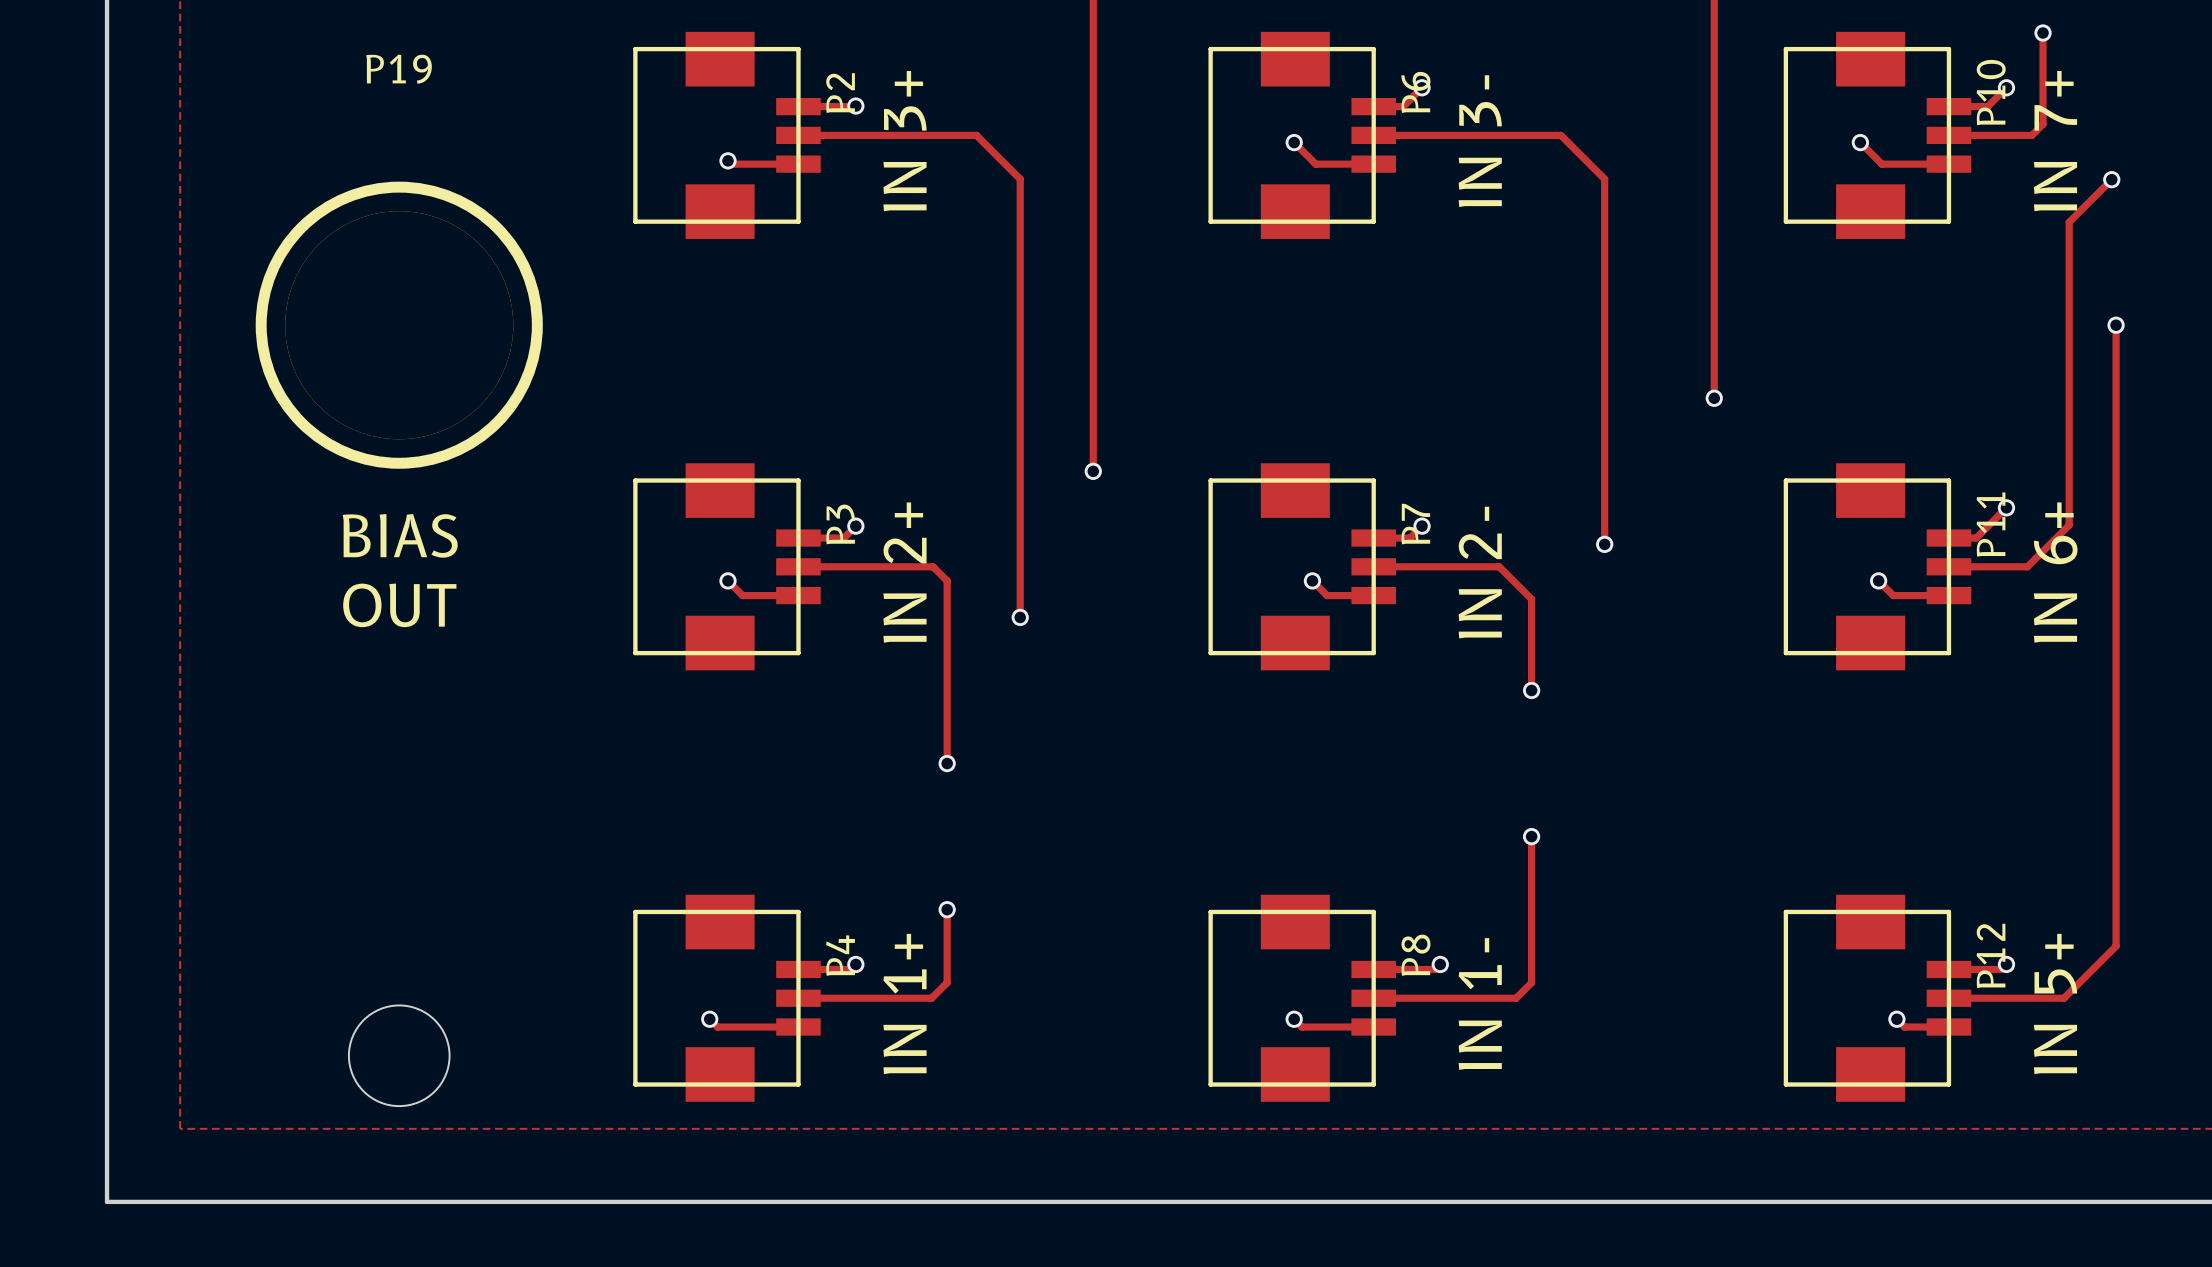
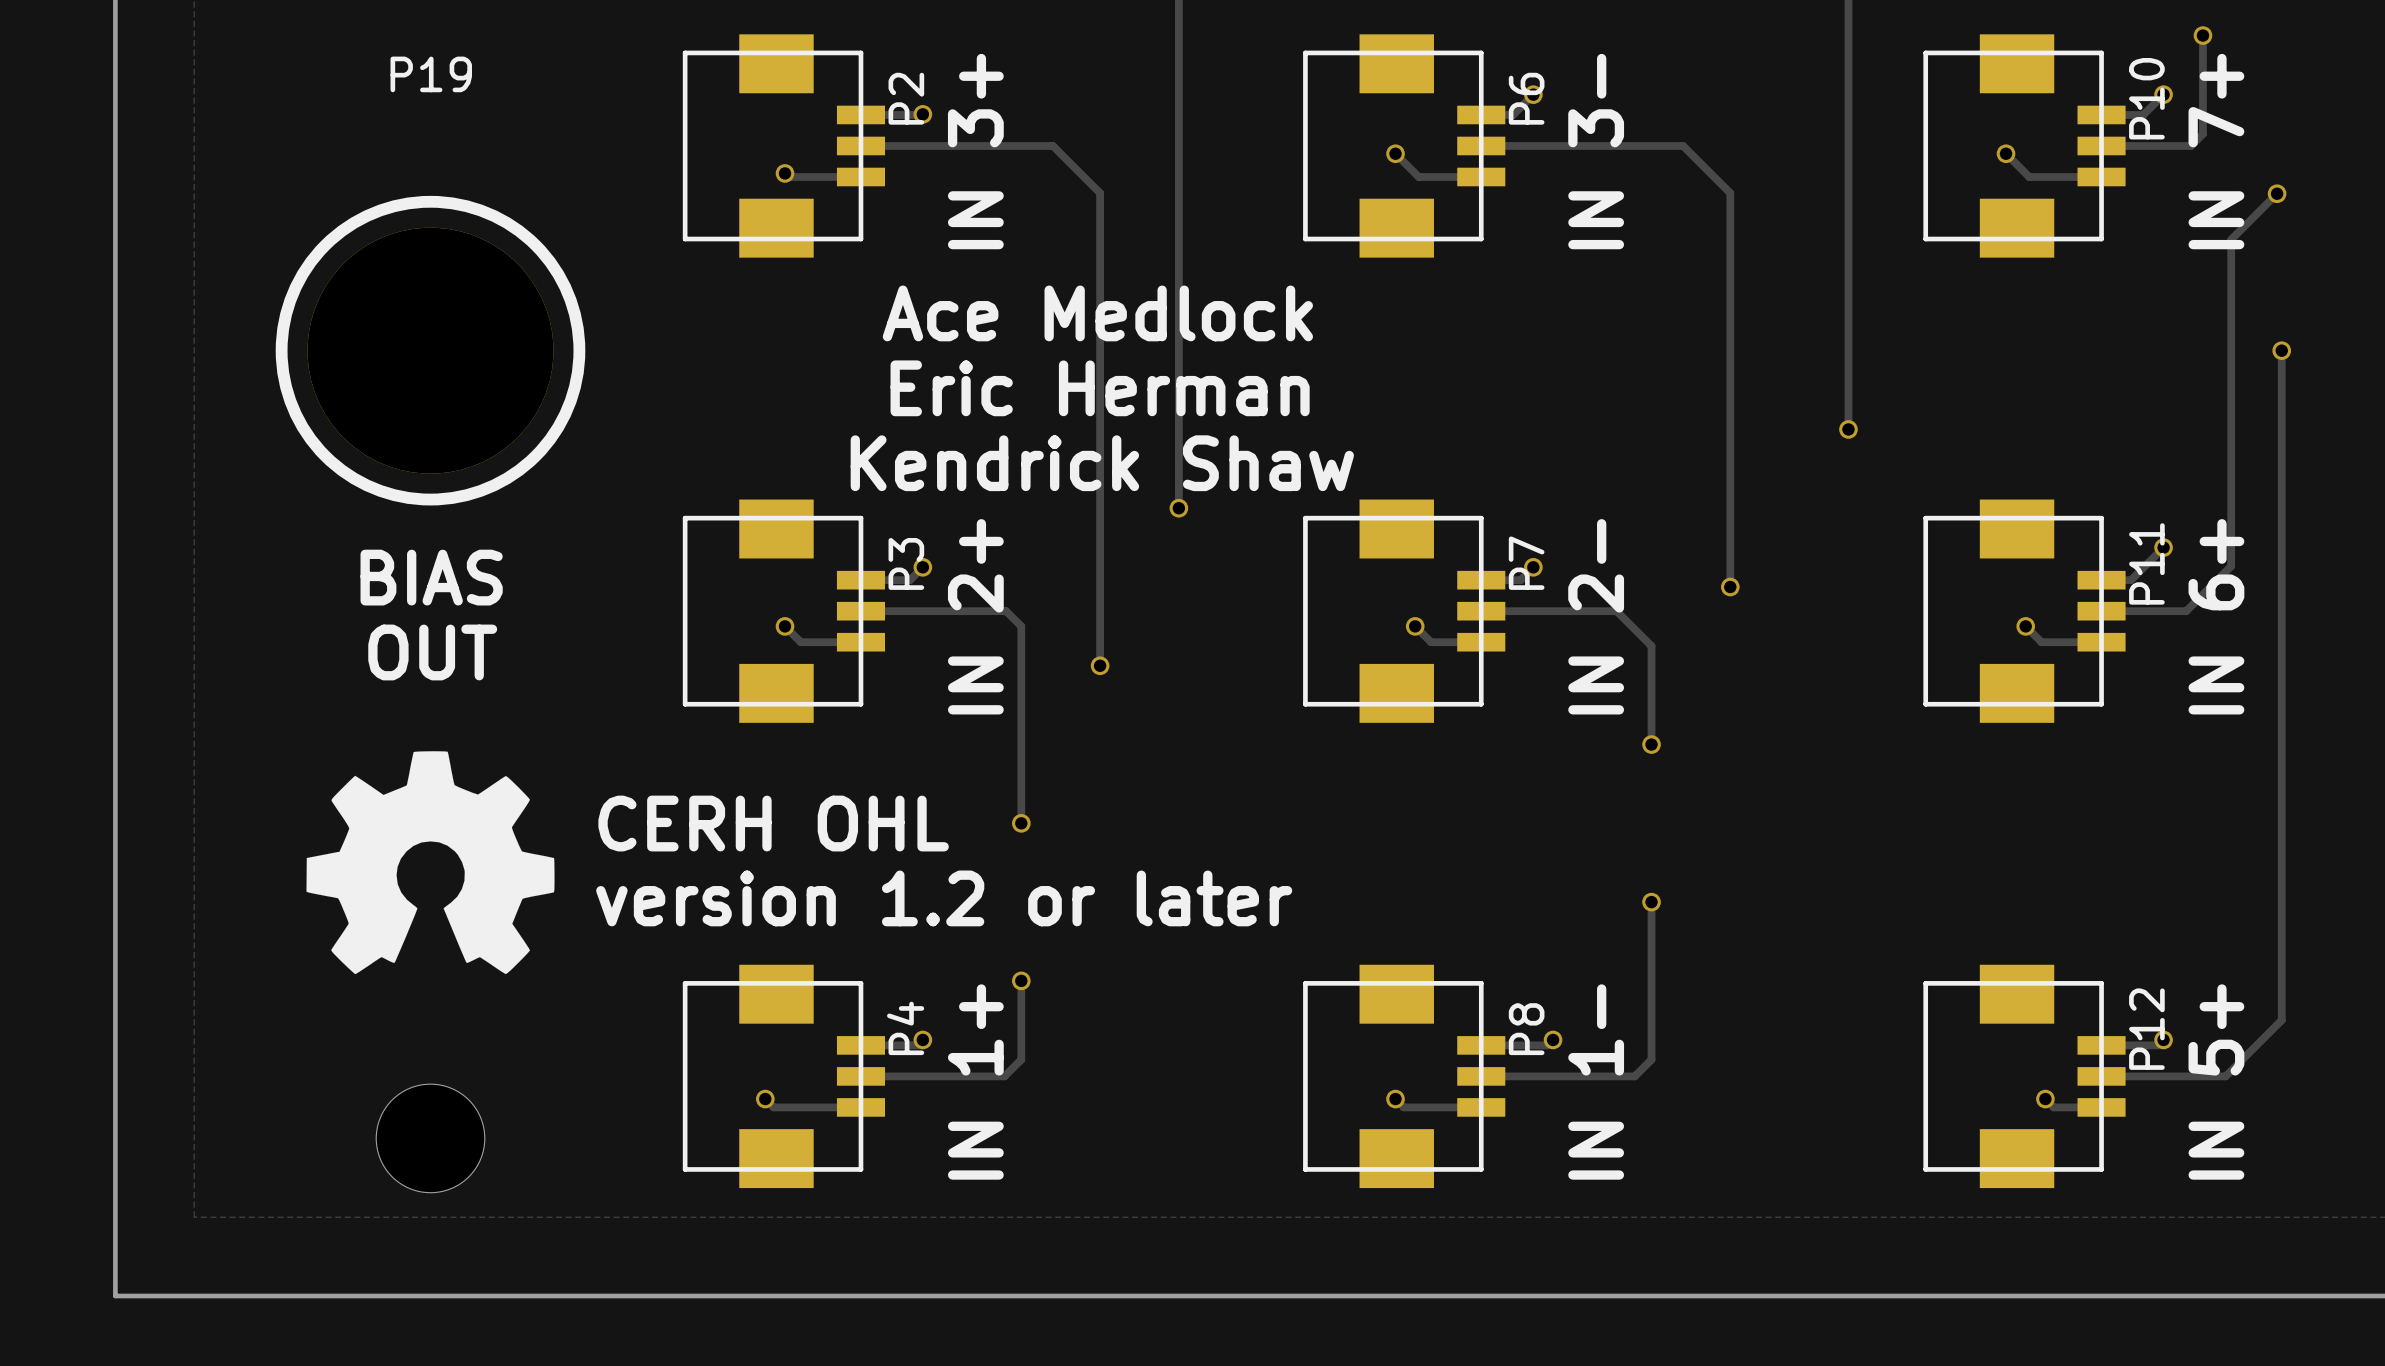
text: none -> Ace Medlock (1097, 313)
text: none -> Eric Herman (1100, 388)
text: none -> Kendrick Shaw (1102, 463)
drawing: none -> [306, 751, 555, 975]
text: none -> CERH OHL (773, 823)
text: none -> version 1.2 or later (944, 898)

